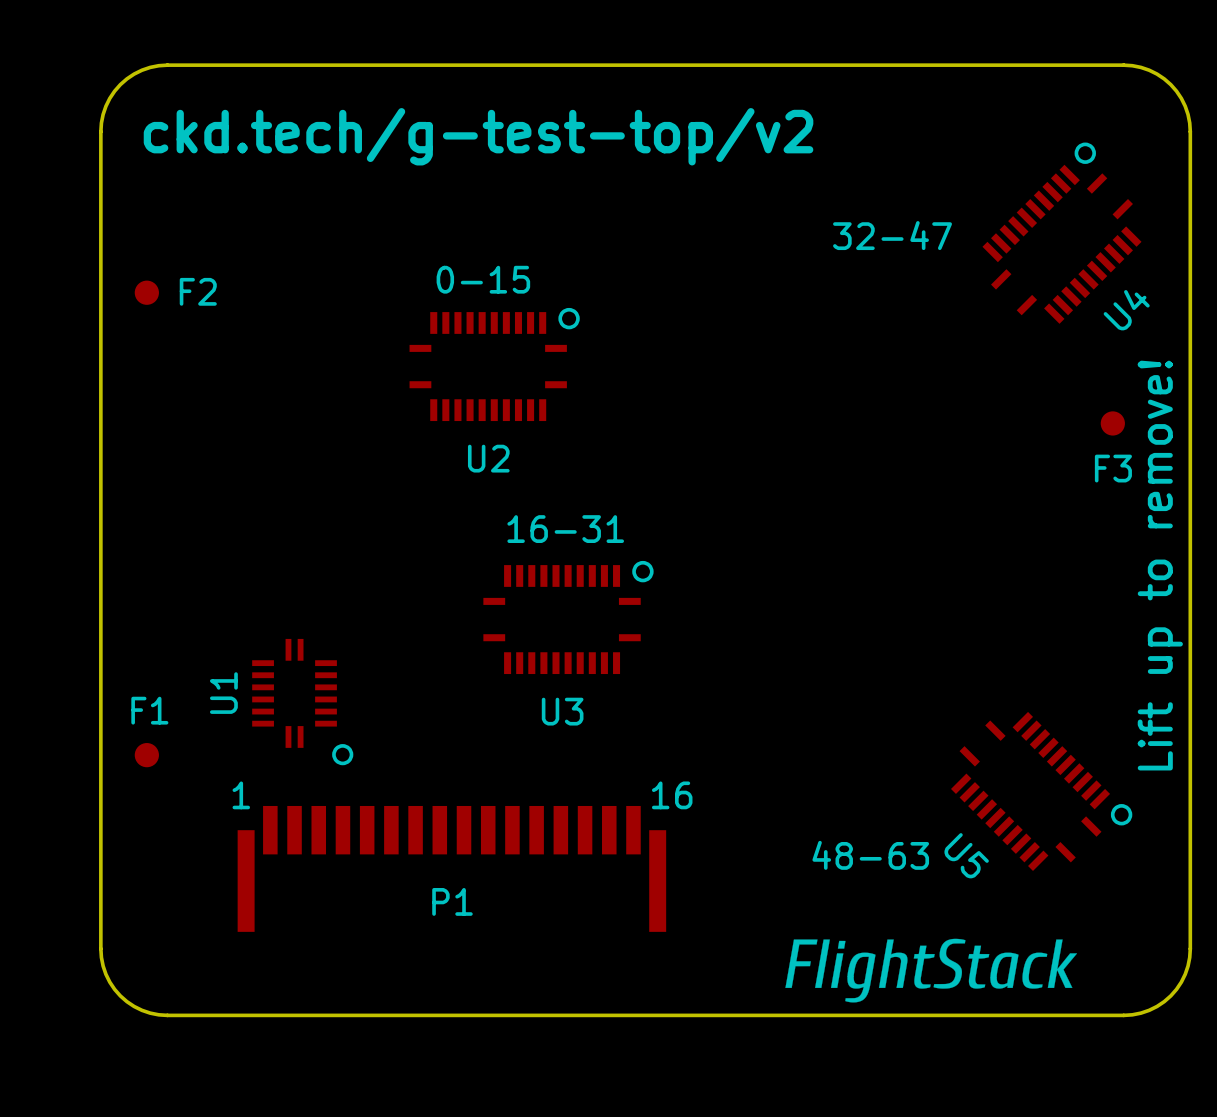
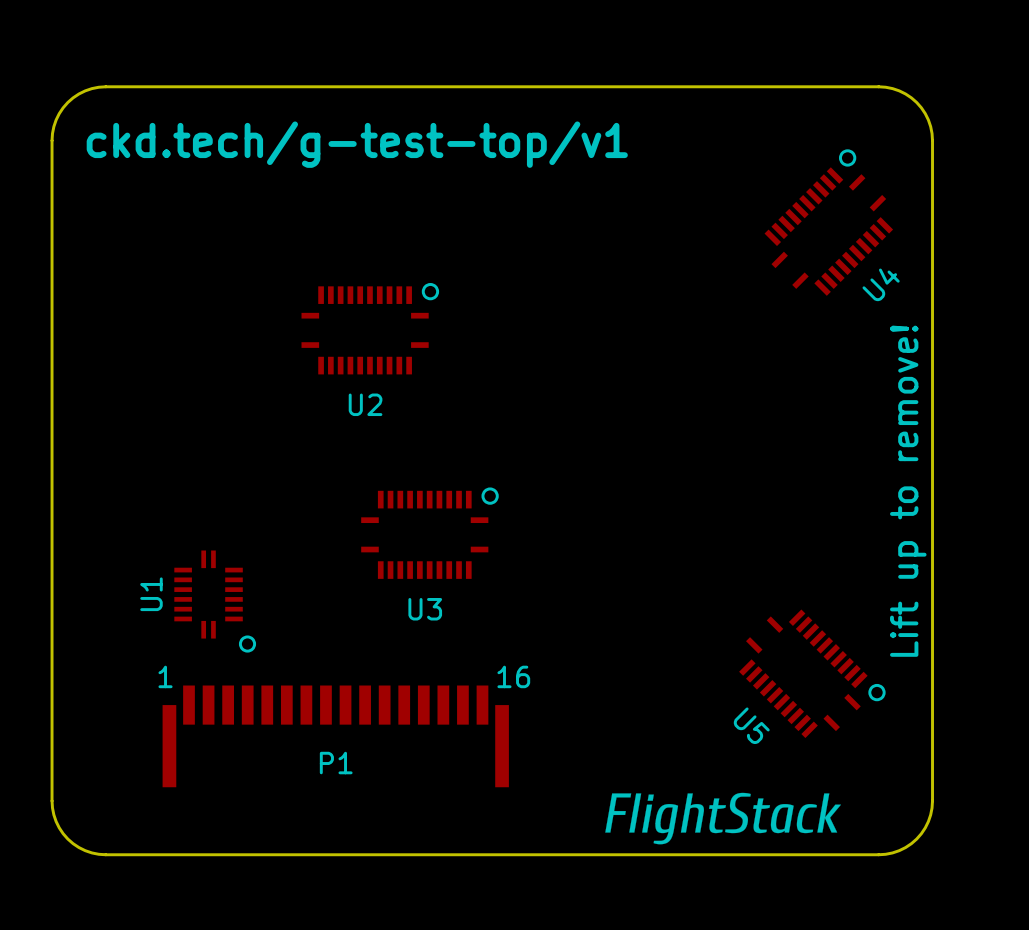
text: ckd.tech/g-test-top/v2 (478, 136) -> ckd.tech/g-test-top/v1 (357, 144)
text: 32-47 (892, 235) -> none
text: 0-15 (483, 279) -> none
F2: (146, 292) -> none
F3: (1112, 423) -> none
text: 16-31 (565, 529) -> none
F1: (146, 755) -> none
text: 48-63 (870, 855) -> none

